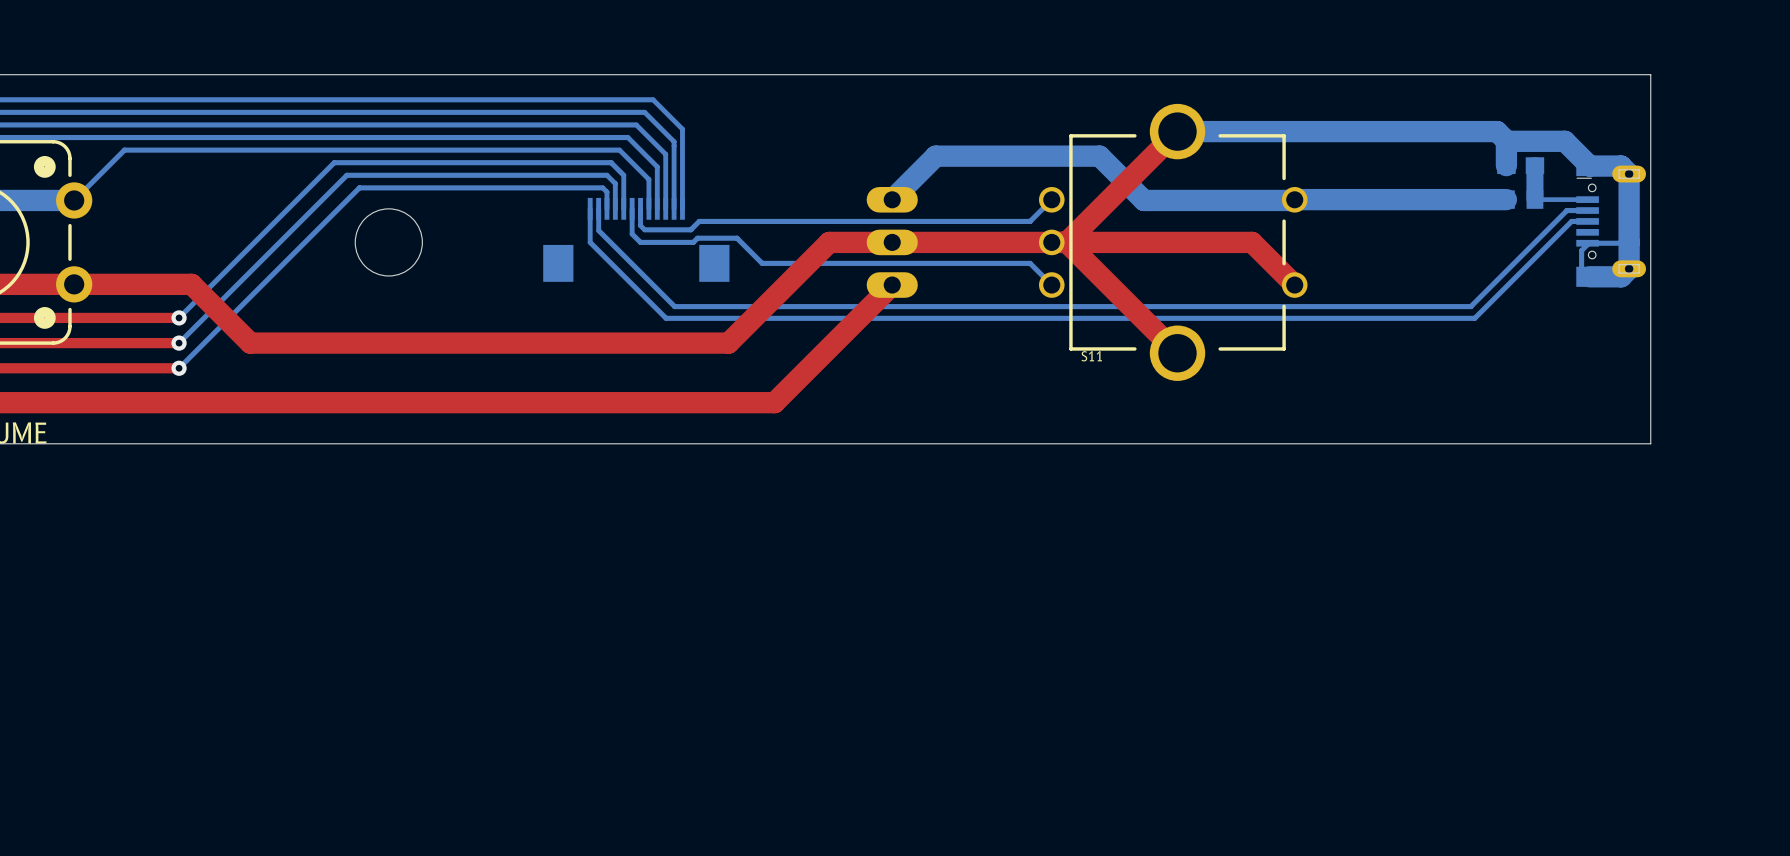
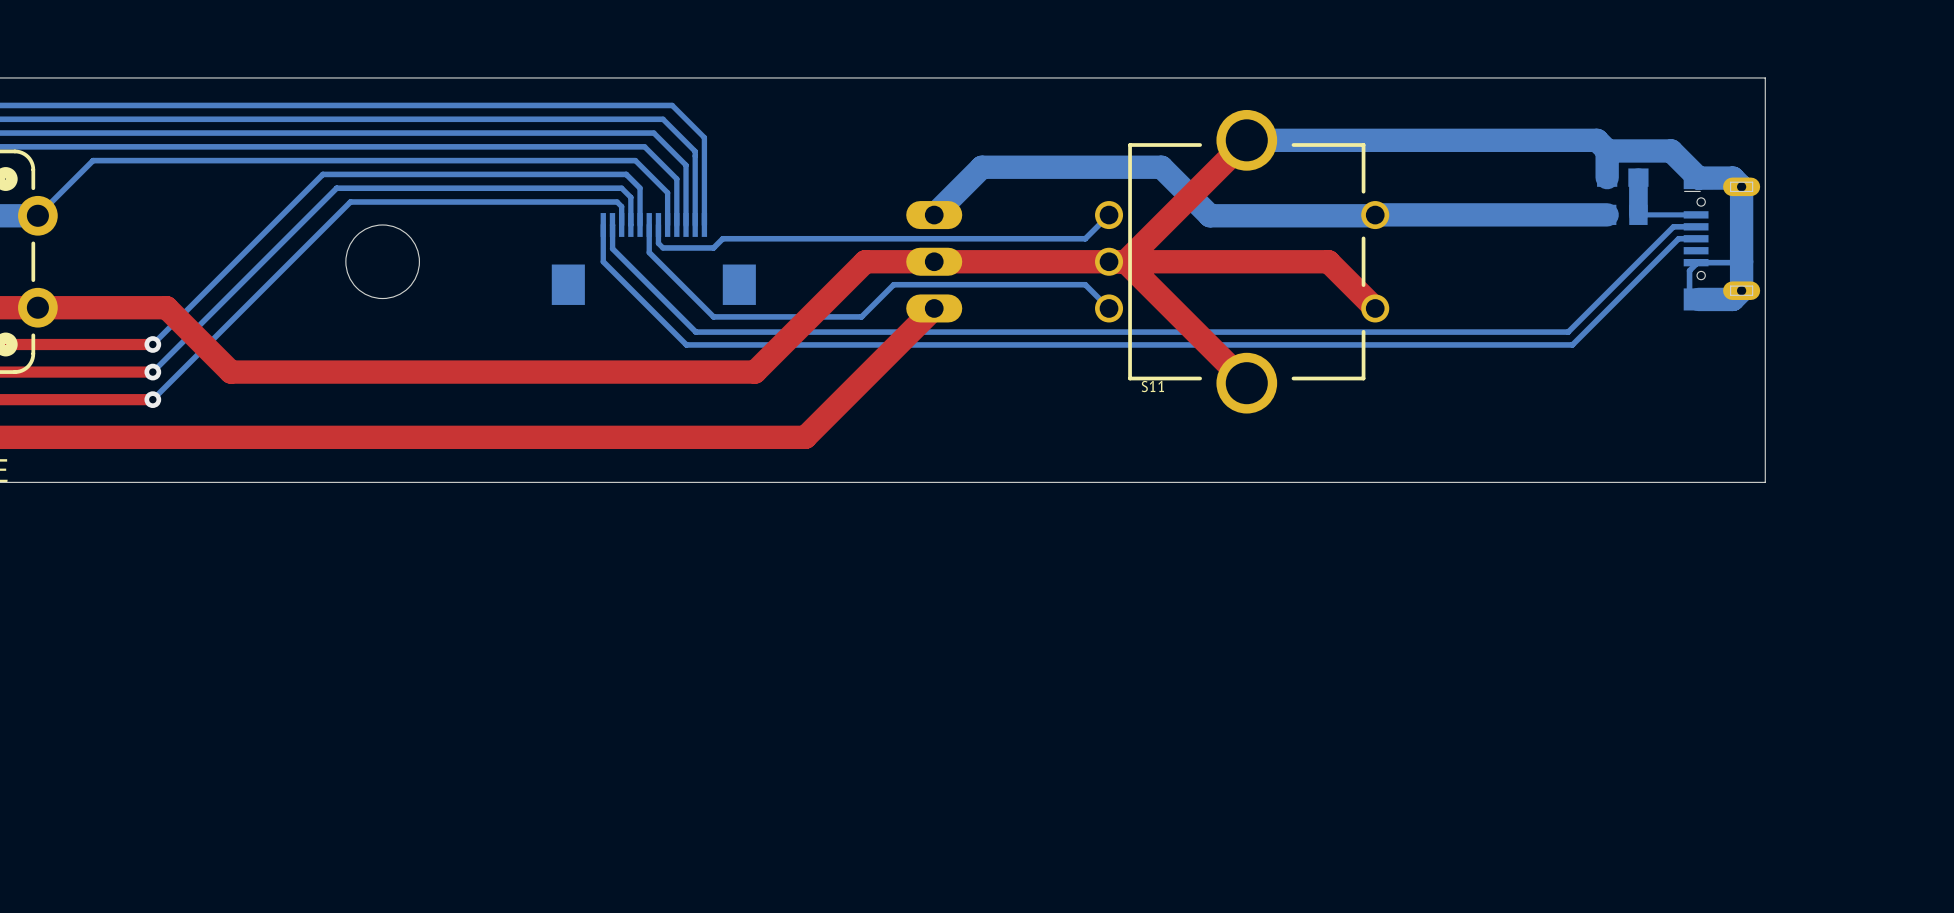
bottom track: (640, 242) (693, 242) (697, 238) (737, 238) (762, 263) (855, 263) -> (658, 261) (713, 316) (861, 316) (893, 284)

